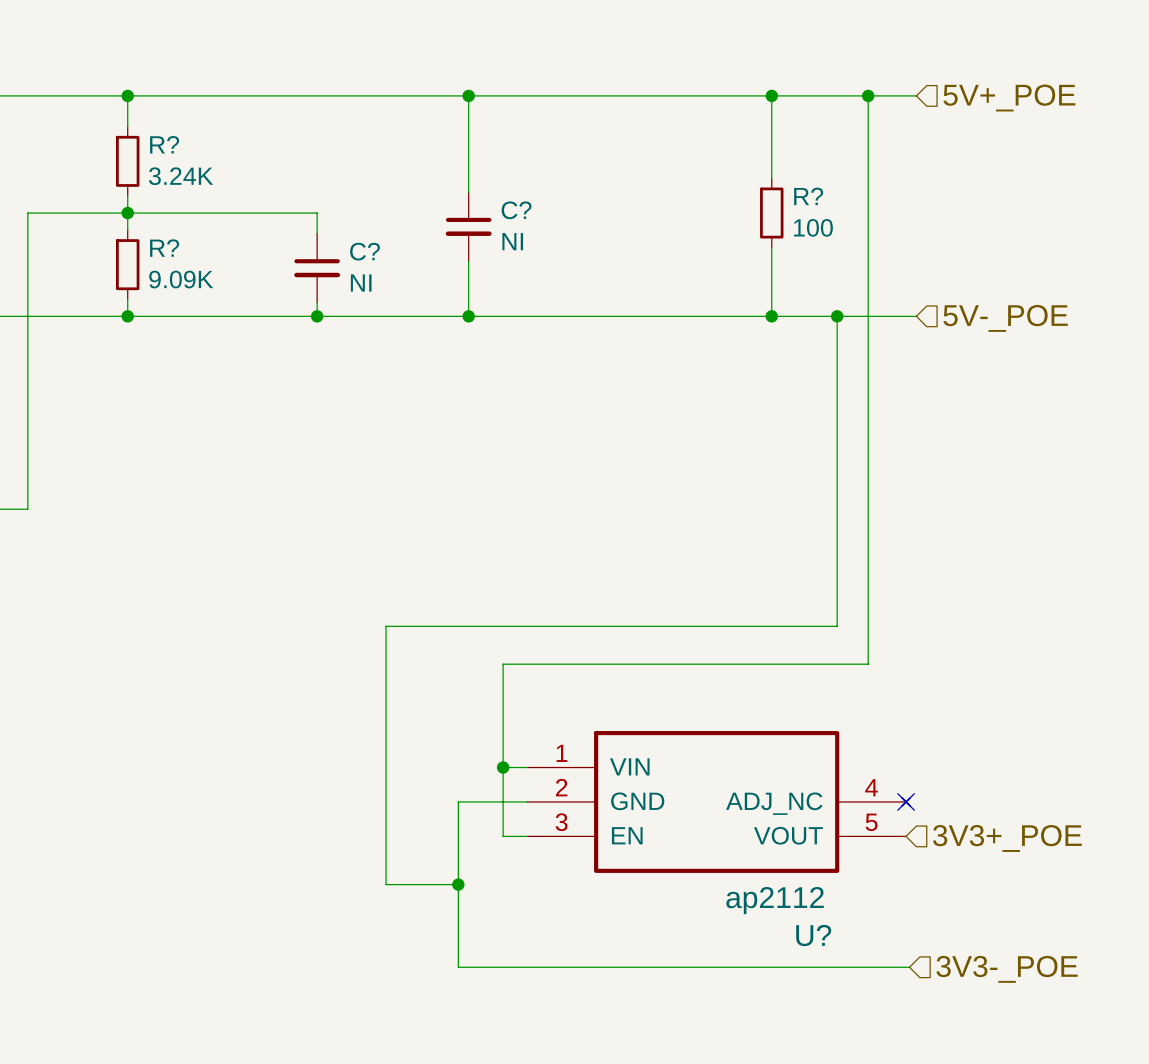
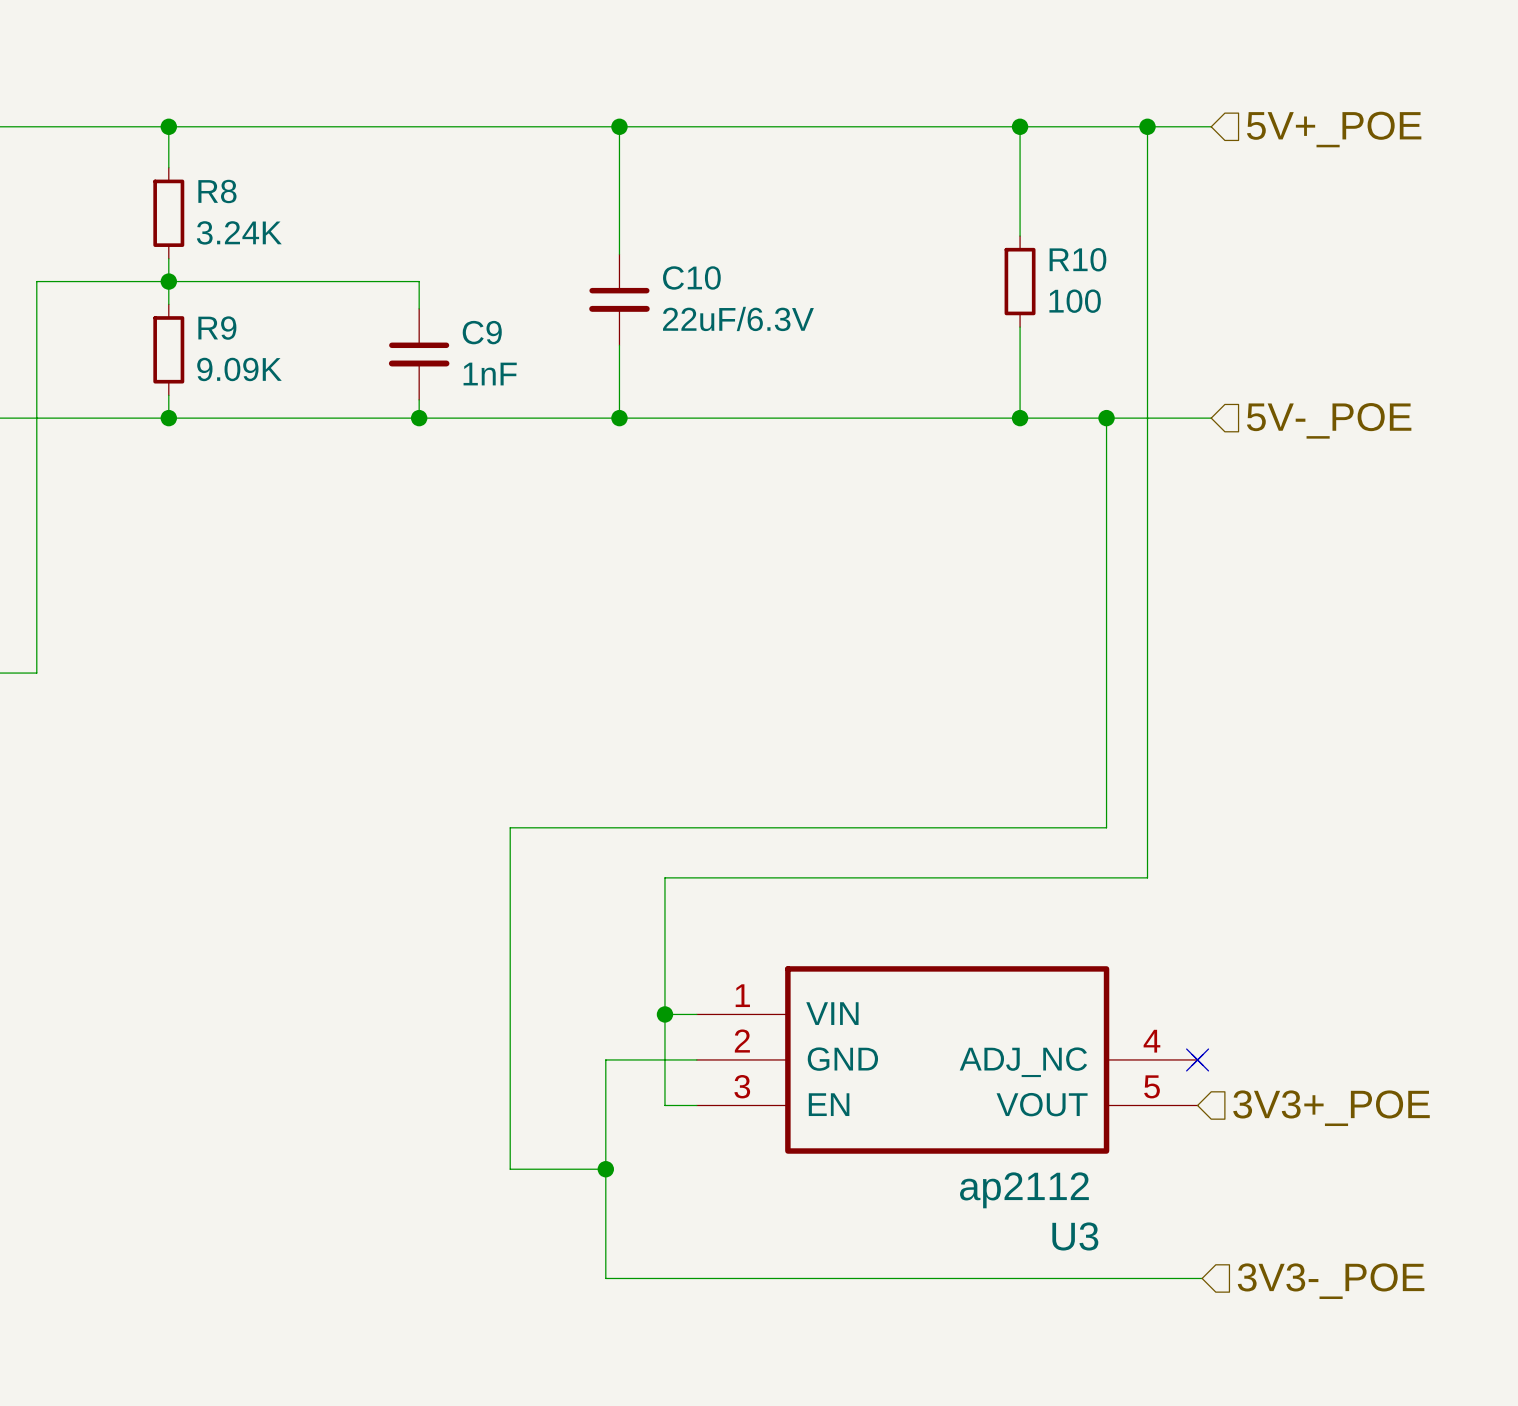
R? name: R? (164, 144) -> R8 (217, 191)
R? name: R? (808, 196) -> R10 (1077, 259)
C? name: C? (516, 210) -> C10 (691, 277)
C? value: NI (512, 241) -> 22uF/6.3V (738, 318)
R? name: R? (164, 248) -> R9 (217, 328)
C? name: C? (364, 251) -> C9 (482, 332)
C? value: NI (361, 282) -> 1nF (490, 374)
U? name: U? (813, 935) -> U3 (1075, 1236)

